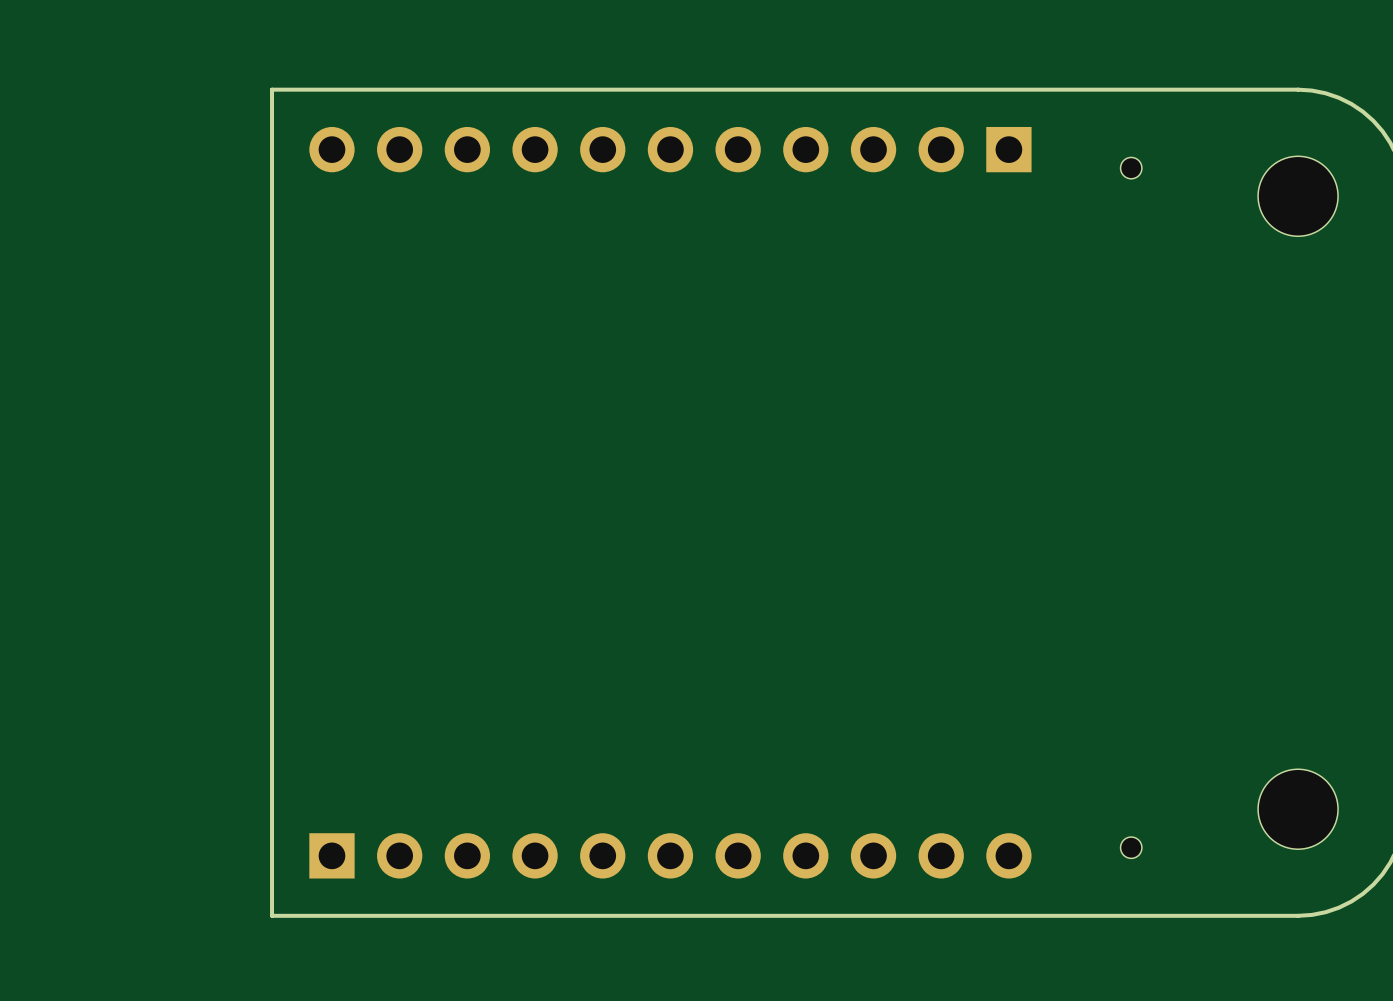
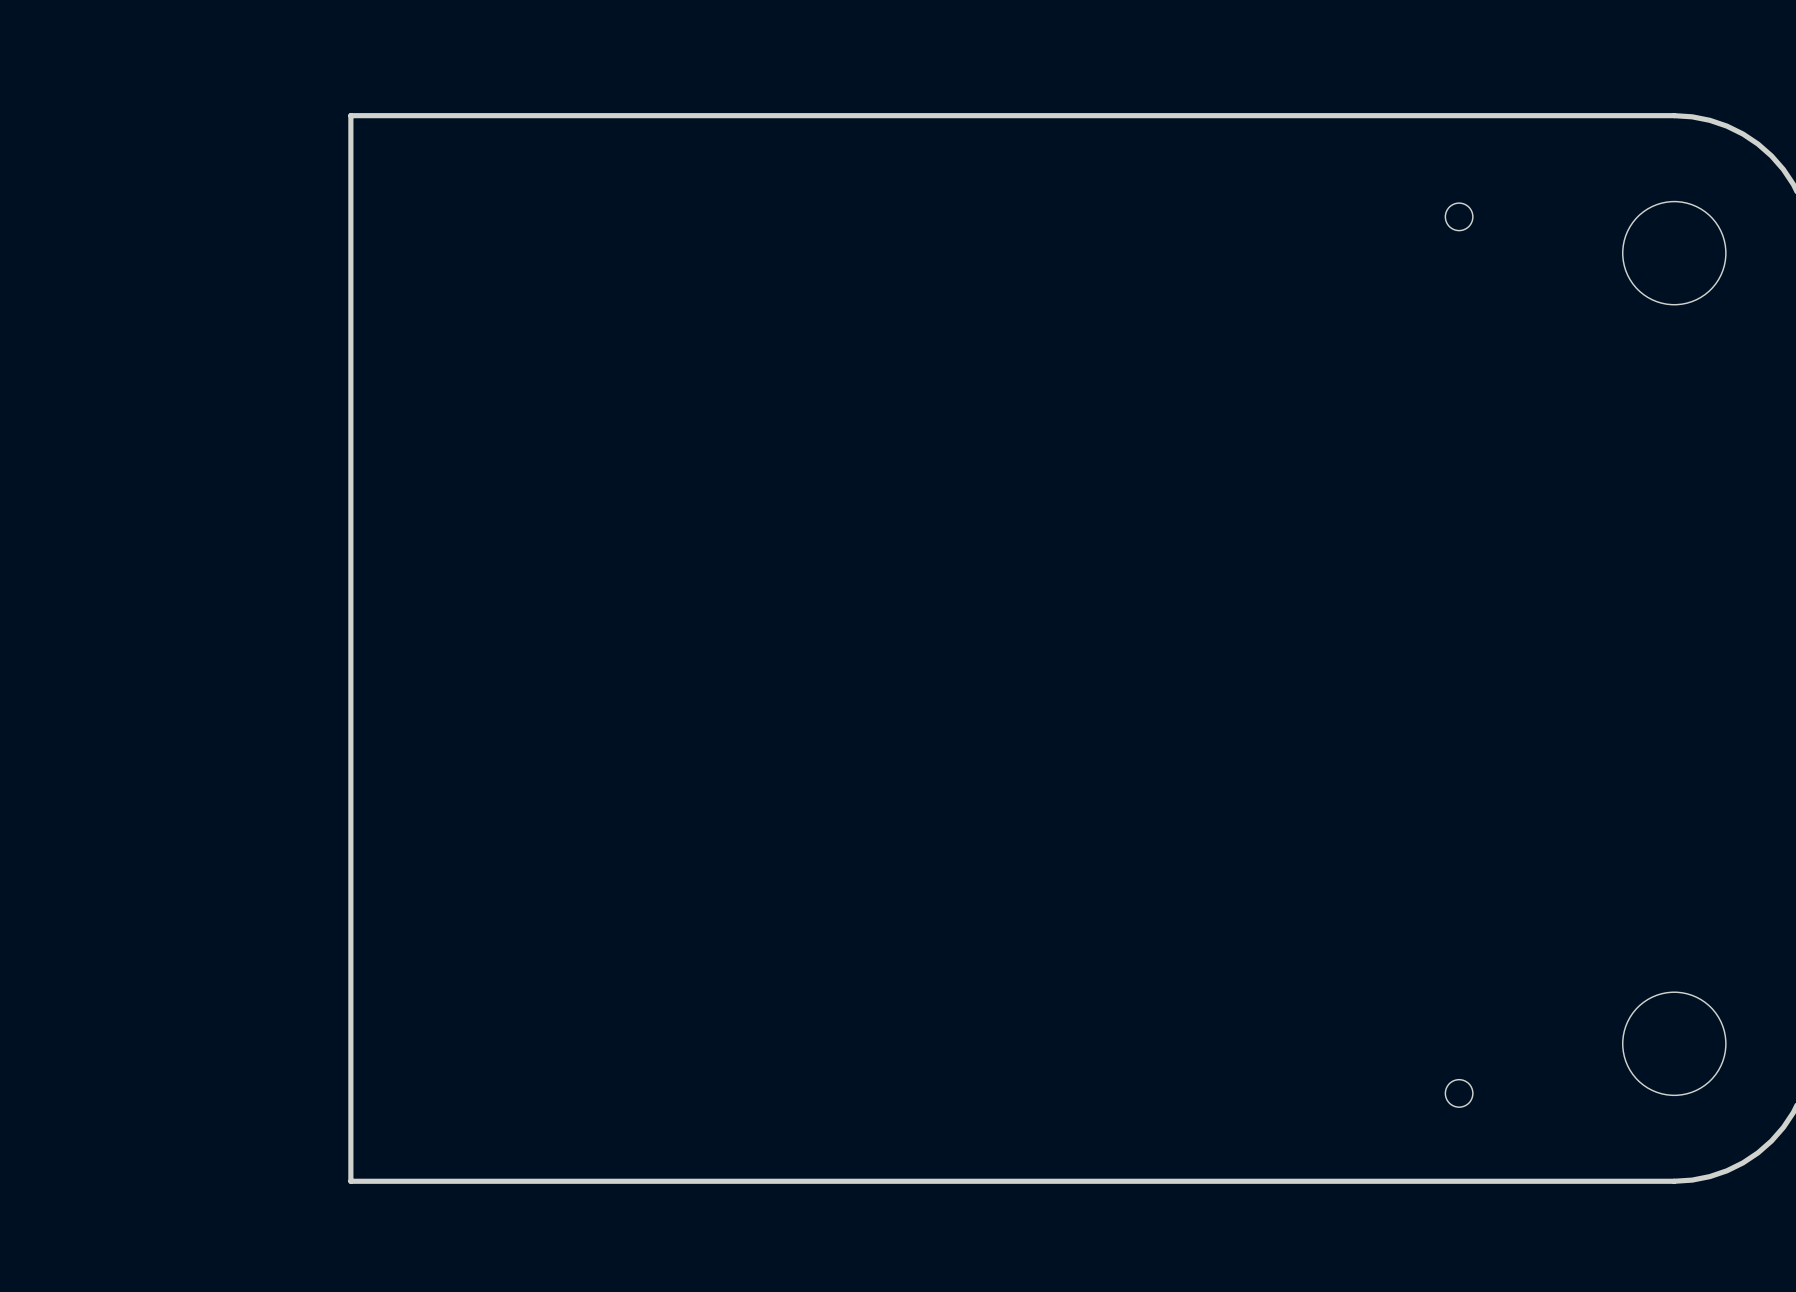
part: (670, 149) -> none
part: (670, 855) -> none

